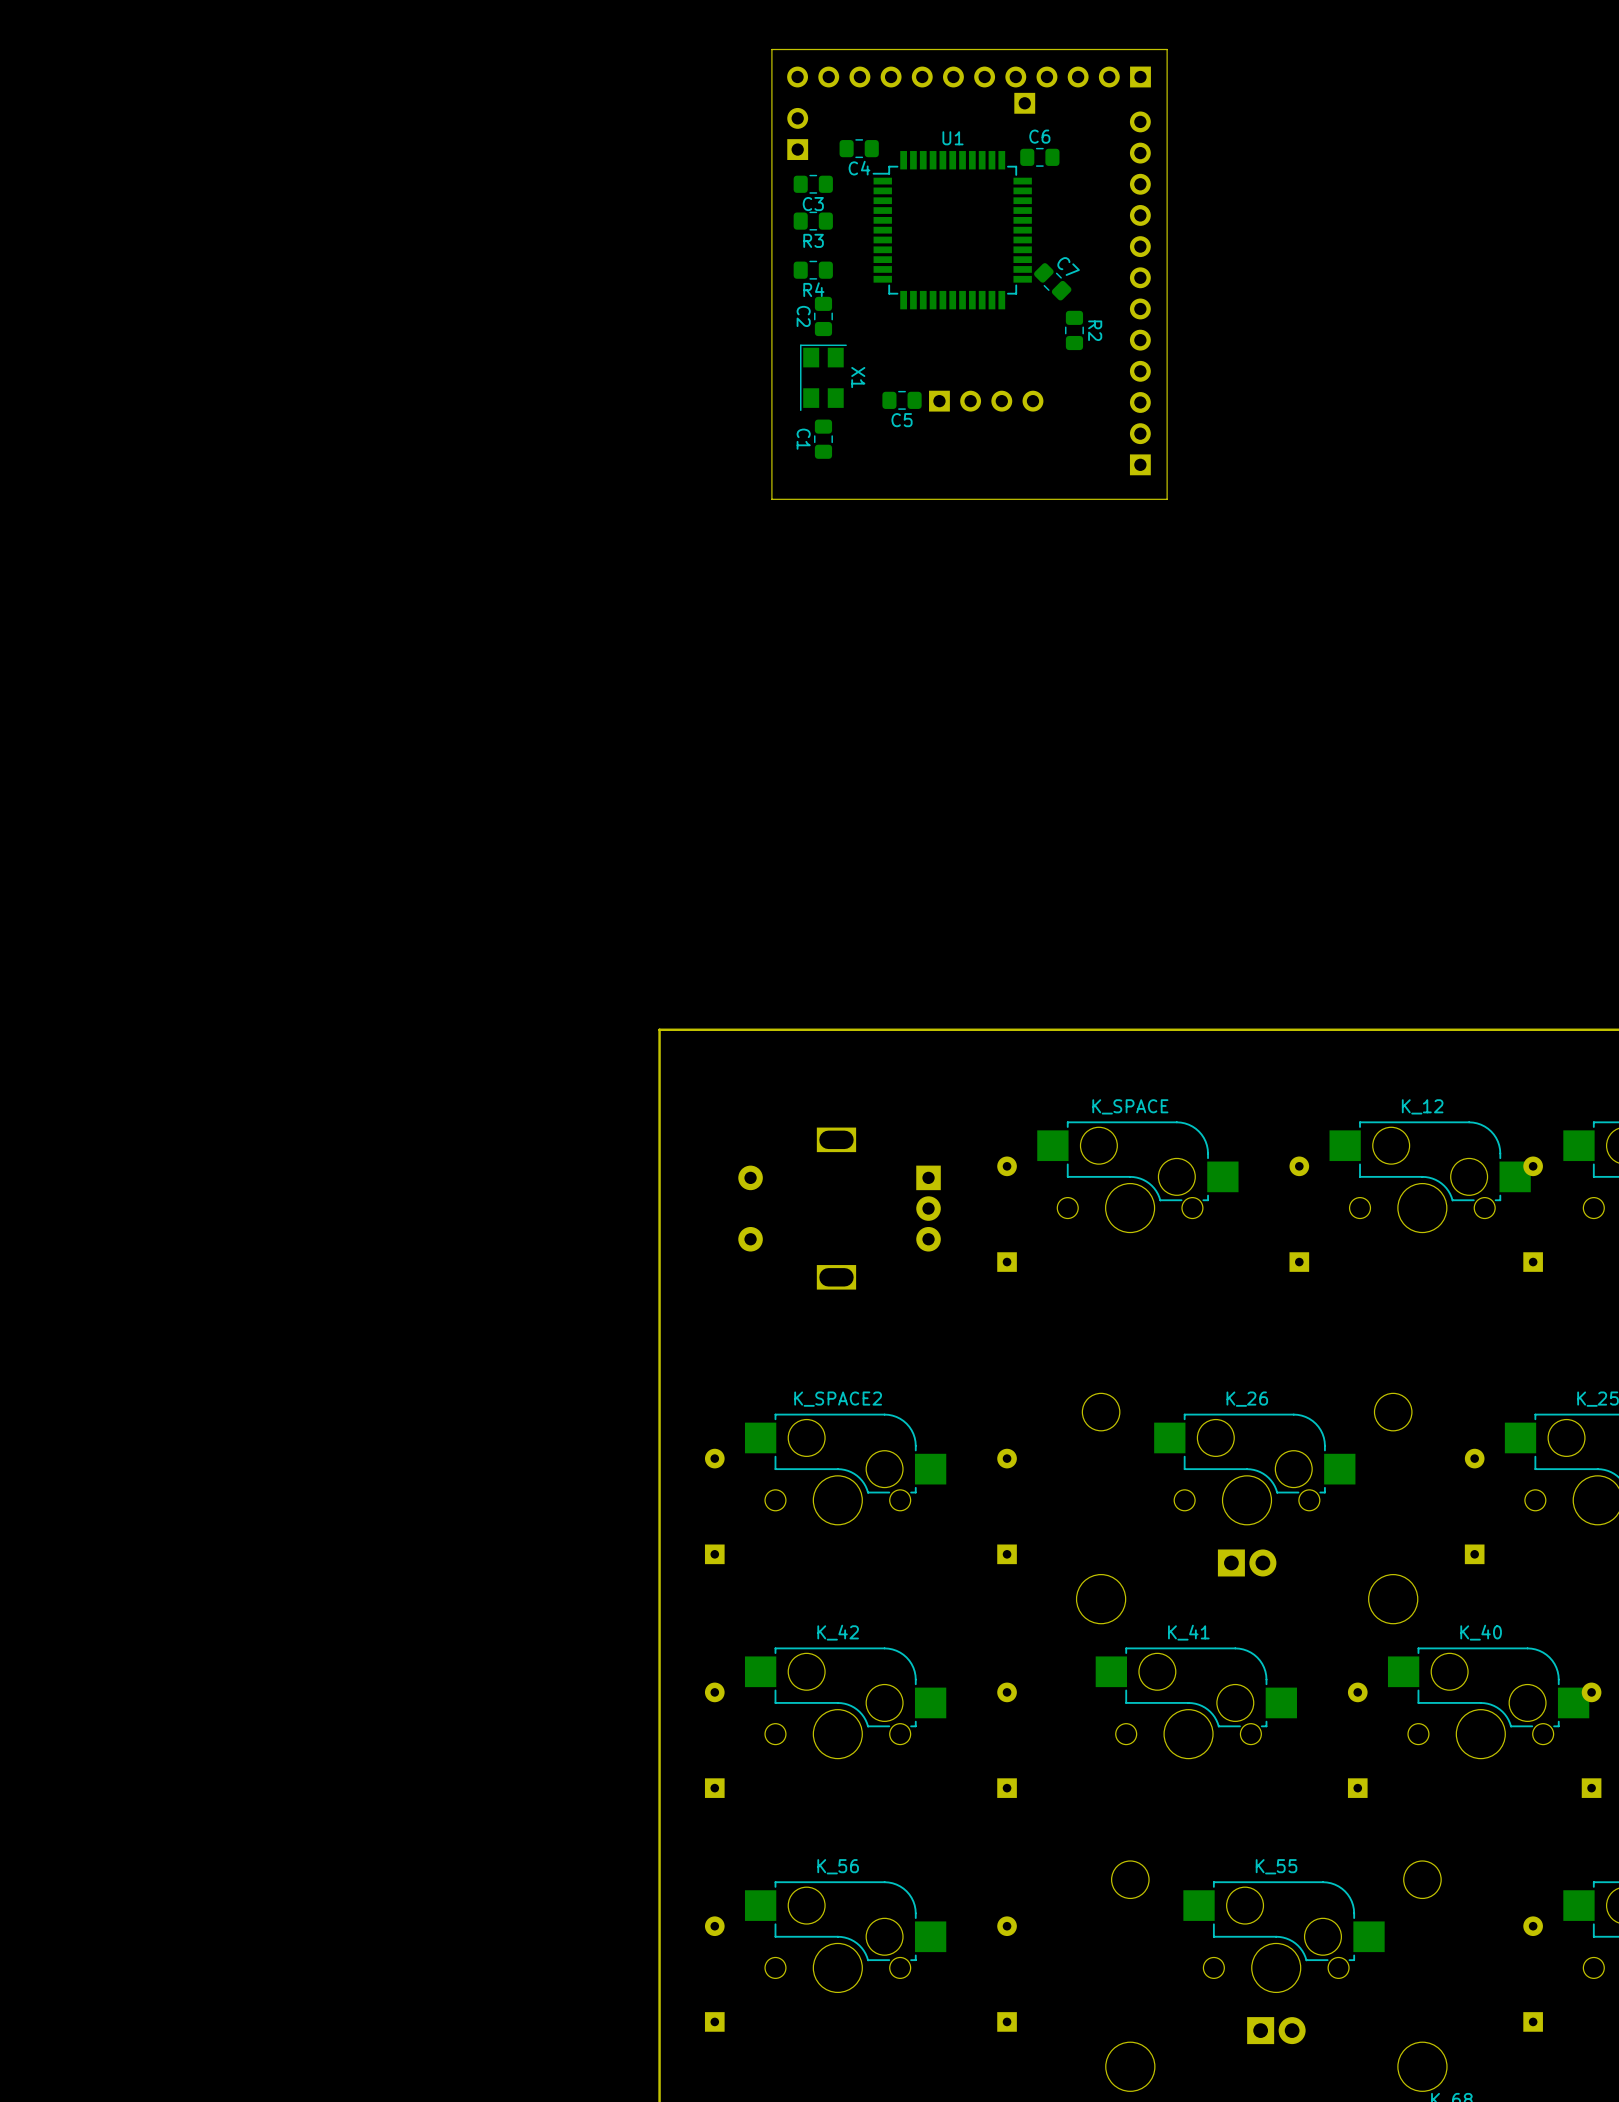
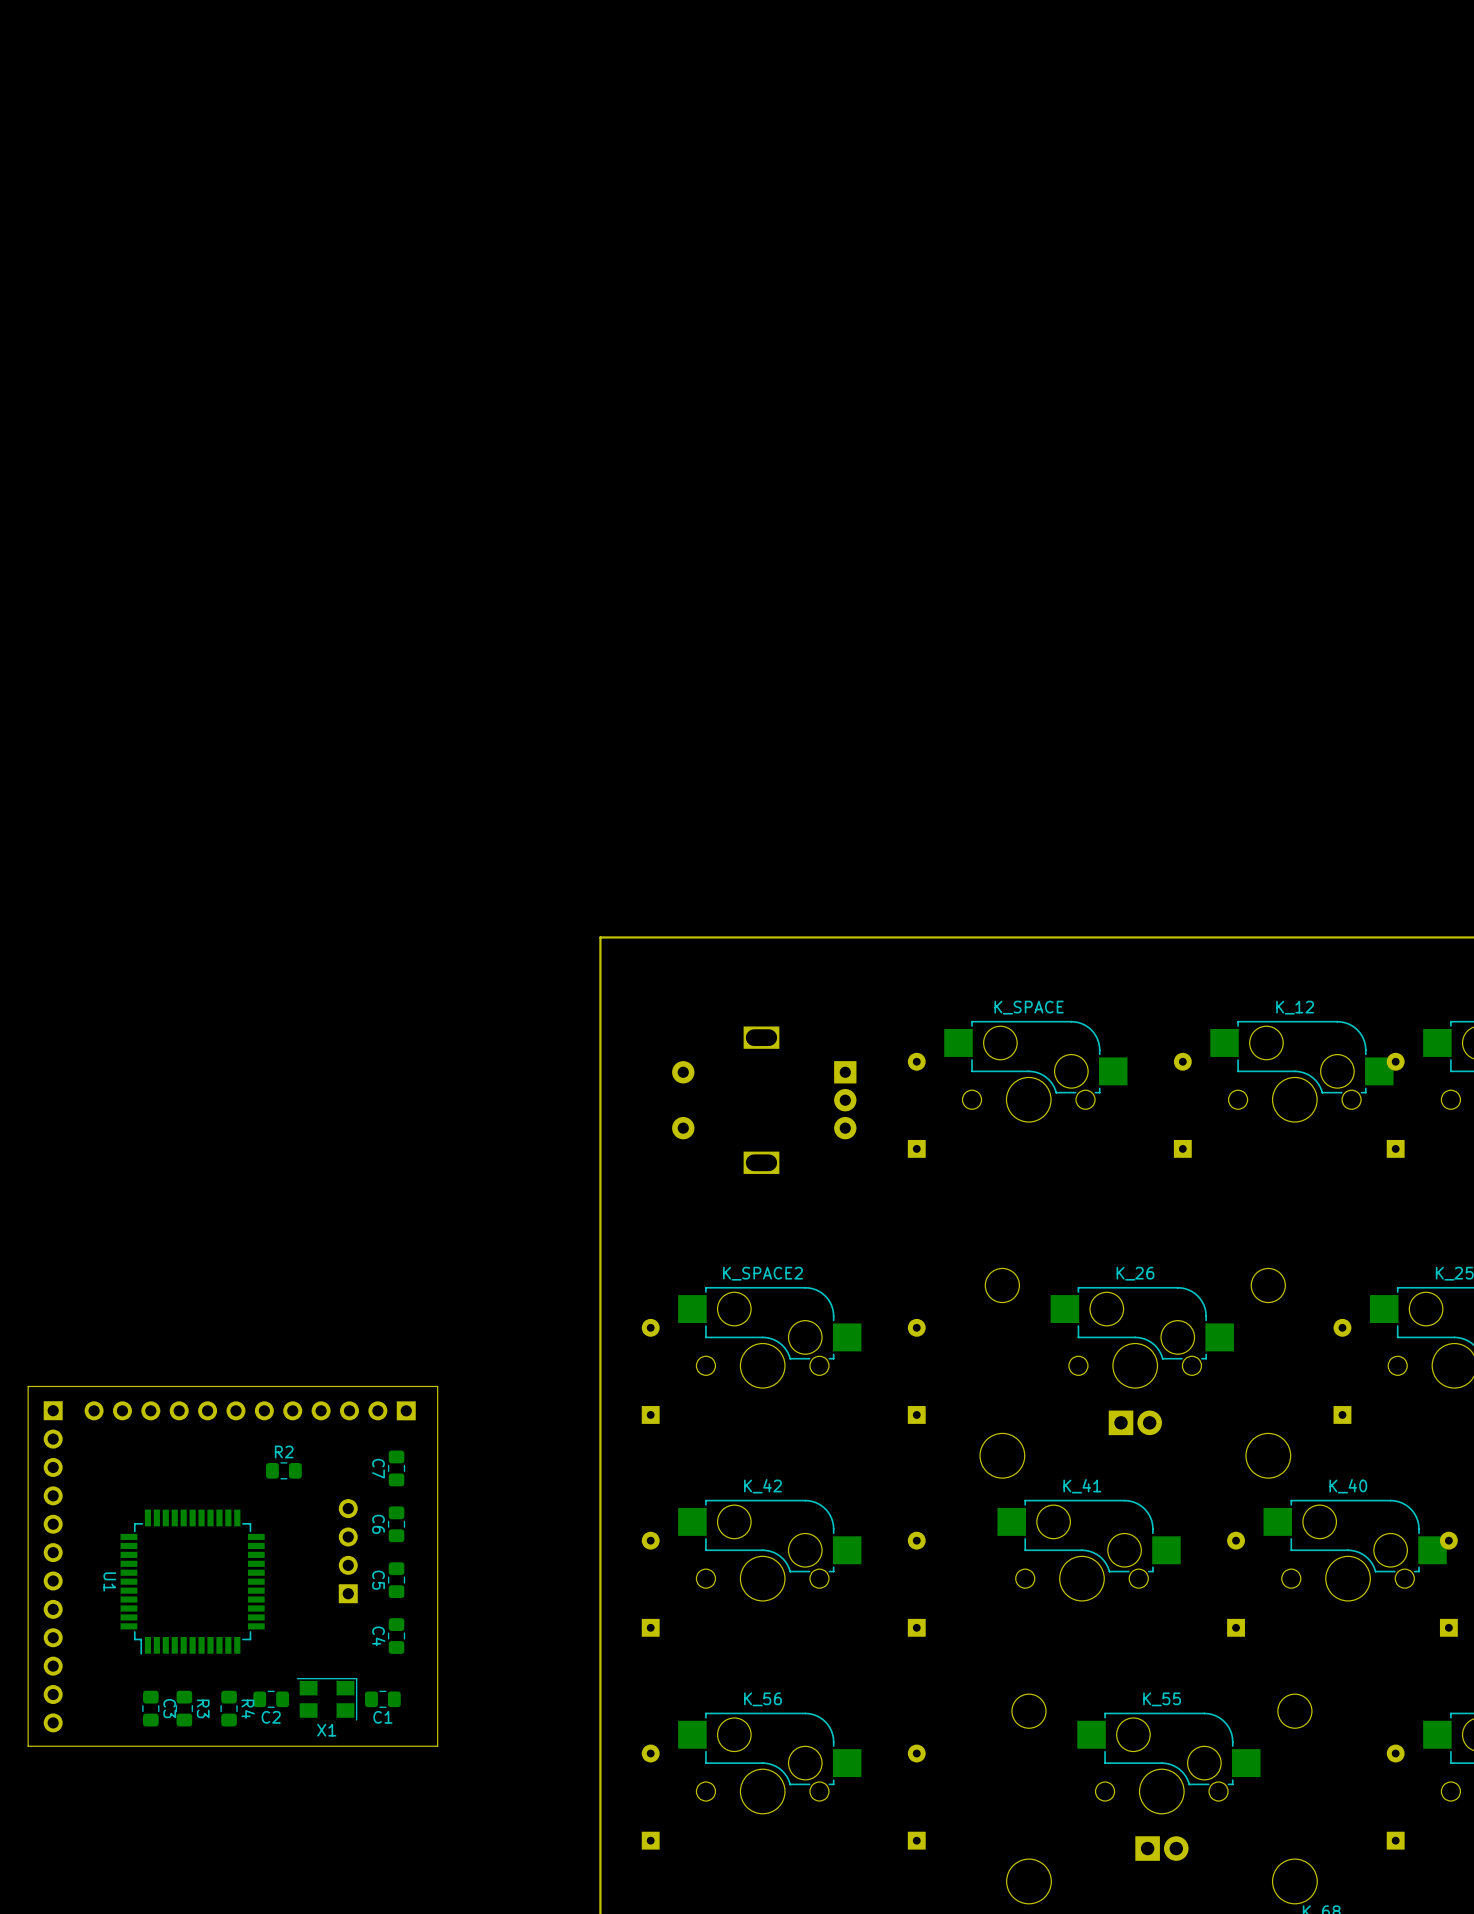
board edge: (1167, 49) (771, 49) (771, 499) (1167, 499) (1167, 49) -> none
part: (969, 76) -> none
part: (1024, 103) -> none
part: (797, 133) -> none
C6 name position: C6 (1039, 136) -> C6 (378, 1524)
C4 rotation: 0° (859, 148) -> 90° clockwise (396, 1636)
C4 position: (859, 148) -> (396, 1636)
C6 rotation: 0° (1039, 157) -> 90° clockwise (396, 1524)
C6 position: (1039, 157) -> (396, 1524)
C3 rotation: 0° (813, 184) -> 90° clockwise (150, 1708)
C3 position: (813, 184) -> (150, 1708)
C3 name position: C3 (813, 204) -> C3 (169, 1708)
R3 rotation: 0° (813, 221) -> 90° clockwise (184, 1708)
R3 position: (813, 221) -> (184, 1708)
U1 rotation: 0° (952, 230) -> 90° counterclockwise (192, 1582)
U1 position: (952, 230) -> (192, 1582)
R3 name position: R3 (813, 240) -> R3 (203, 1708)
C7 name position: C7 (1068, 266) -> C7 (378, 1468)
R4 rotation: 0° (813, 270) -> 90° clockwise (229, 1708)
R4 position: (813, 270) -> (229, 1708)
C7 rotation: 0° (1052, 281) -> 45° clockwise (396, 1468)
C7 position: (1052, 281) -> (396, 1468)
R4 name position: R4 (813, 289) -> R4 (248, 1709)
part: (1140, 293) -> none
C2 name position: C2 (803, 316) -> C2 (271, 1717)
C2 rotation: 0° (823, 316) -> 90° clockwise (271, 1699)
C2 position: (823, 316) -> (271, 1699)
R2 rotation: 0° (1074, 330) -> 90° clockwise (283, 1470)
R2 position: (1074, 330) -> (283, 1470)
R2 name position: R2 (1095, 330) -> R2 (284, 1451)
X1 rotation: 0° (823, 377) -> 90° clockwise (327, 1699)
X1 position: (823, 377) -> (327, 1699)
C5 rotation: 0° (902, 400) -> 90° clockwise (396, 1580)
C5 position: (902, 400) -> (396, 1580)
part: (986, 401) -> none
C1 name position: C1 (803, 439) -> C1 (382, 1717)
C1 rotation: 0° (823, 439) -> 90° clockwise (382, 1699)
C1 position: (823, 439) -> (382, 1699)
board edge: none -> (437, 1386) (28, 1386) (28, 1746) (437, 1746) (437, 1386)
part: none -> (250, 1410)
part: none -> (348, 1551)
part: none -> (53, 1566)

